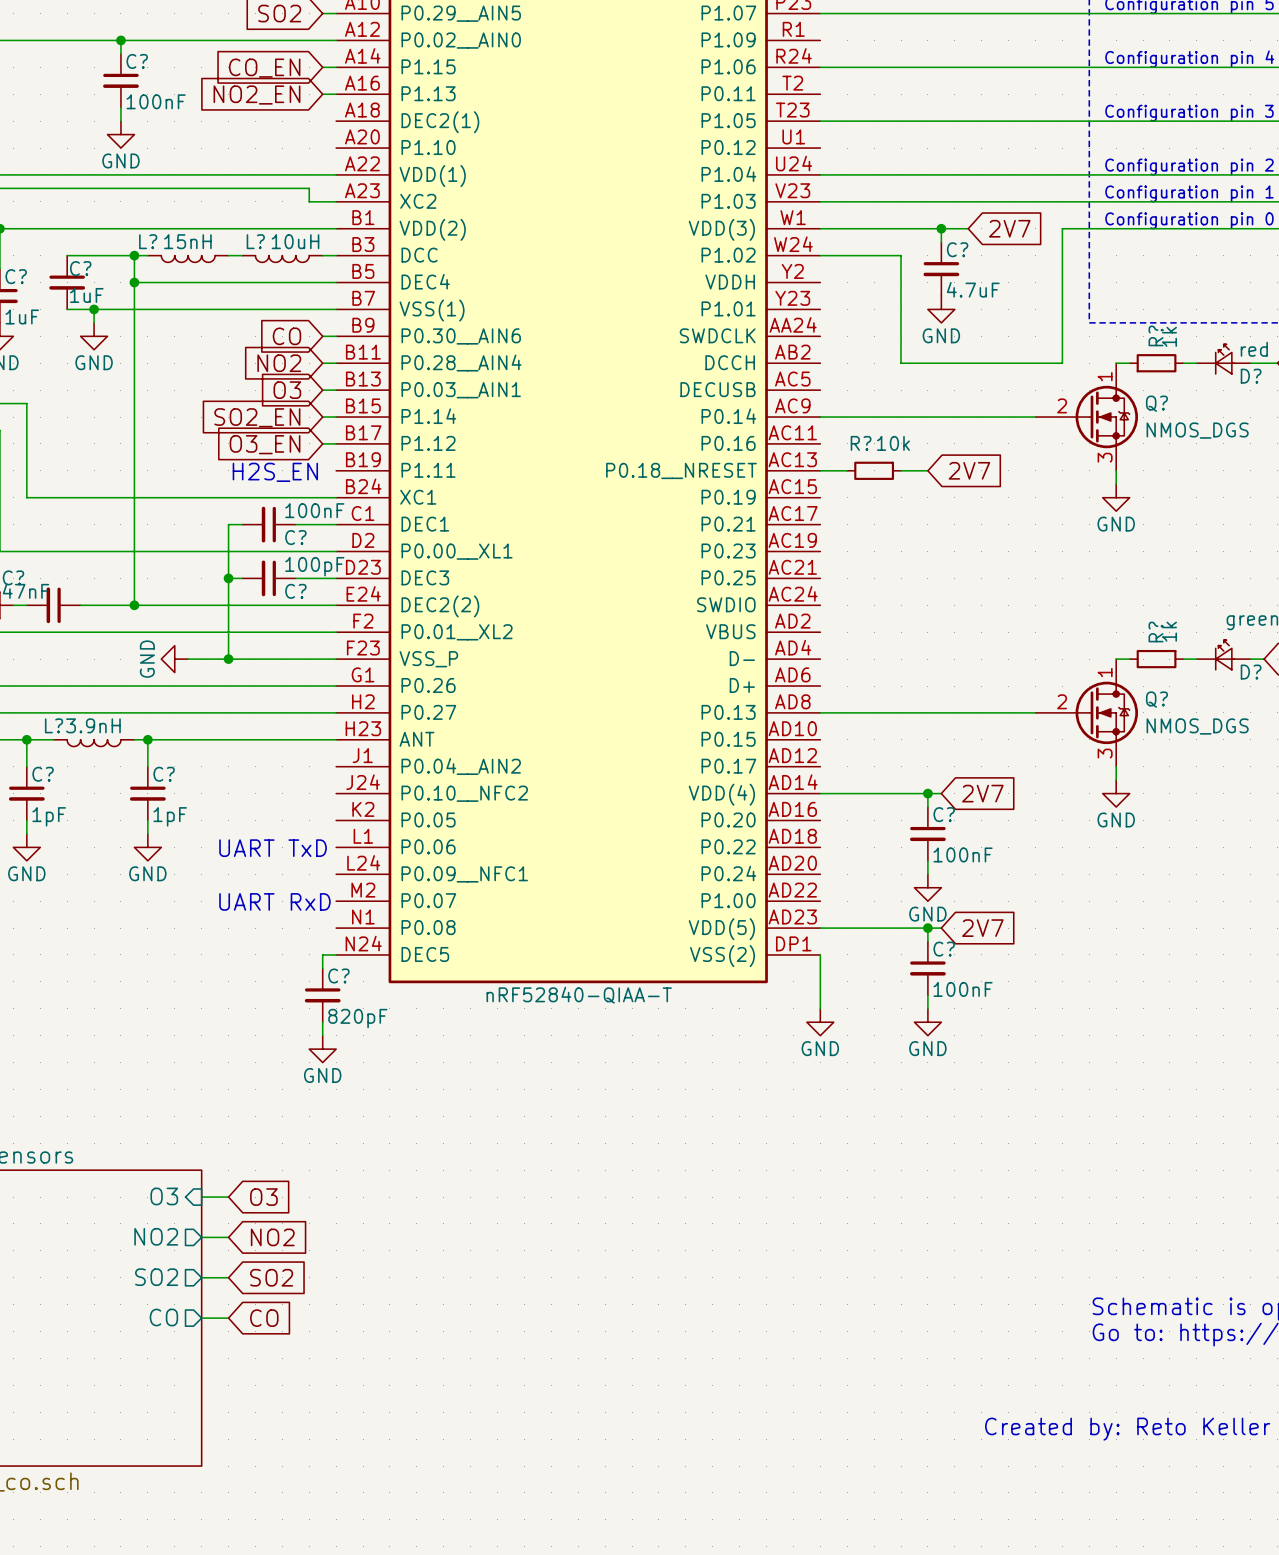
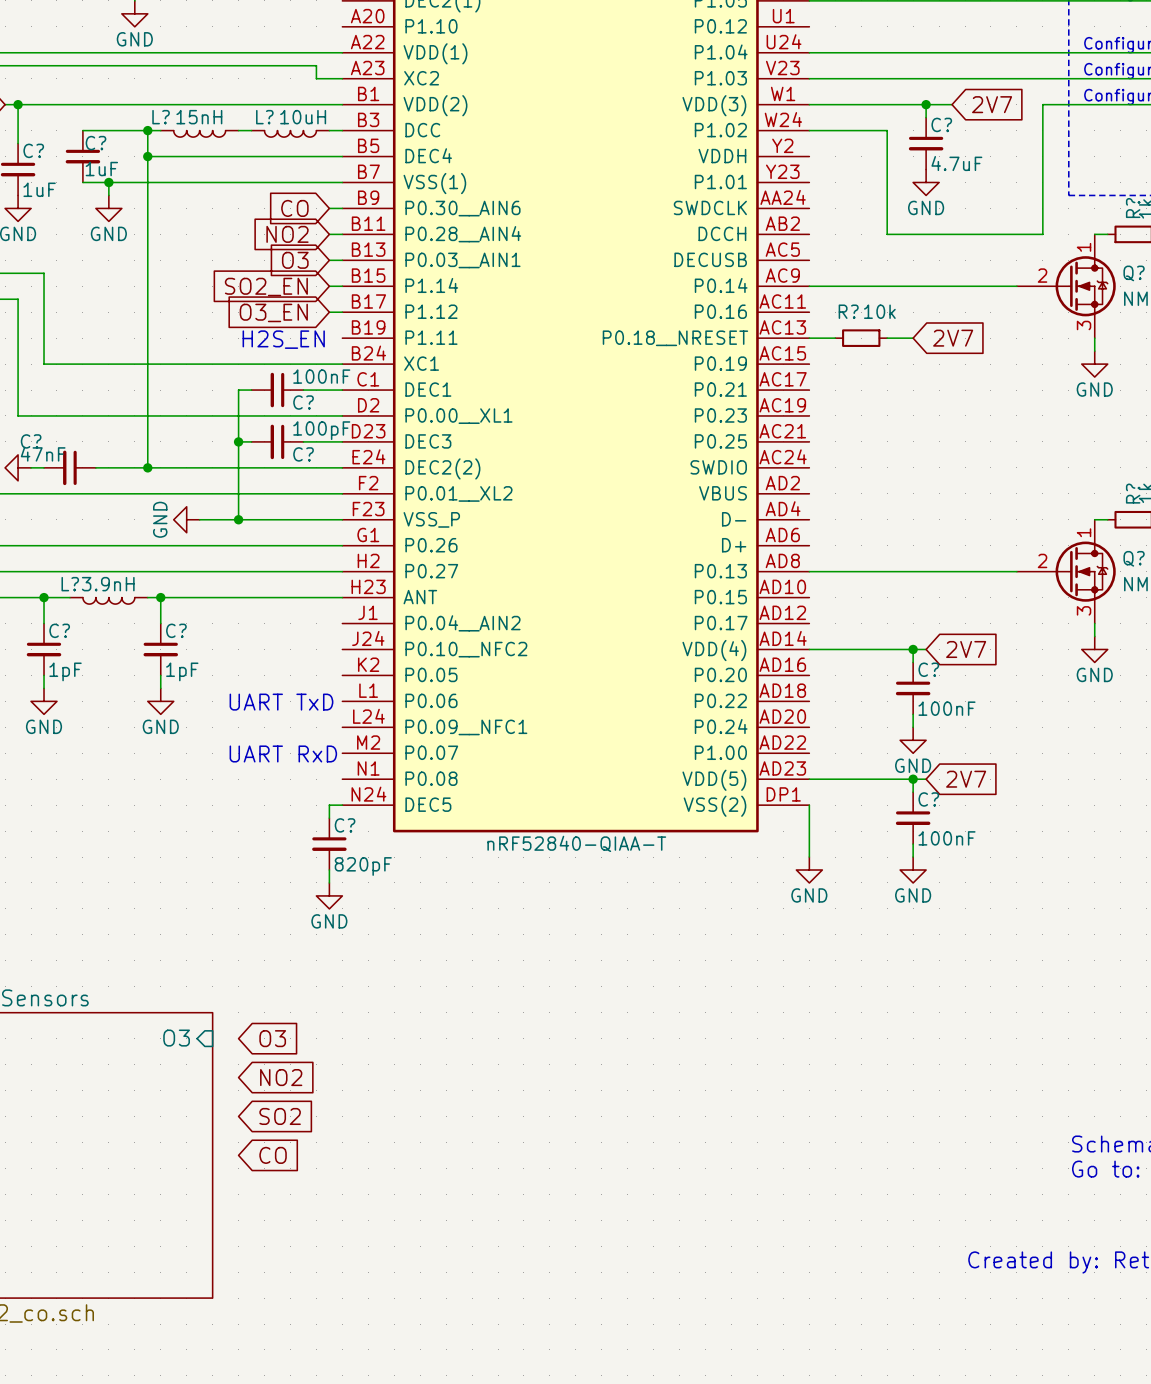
wire: (201, 1197) (228, 1197) -> none
sheet pin: NO2 (156, 1236) -> none
wire: (201, 1237) (228, 1237) -> none
sheet pin: SO2 (156, 1277) -> none
wire: (201, 1277) (228, 1277) -> none
sheet pin: CO (163, 1317) -> none
wire: (201, 1318) (228, 1318) -> none

